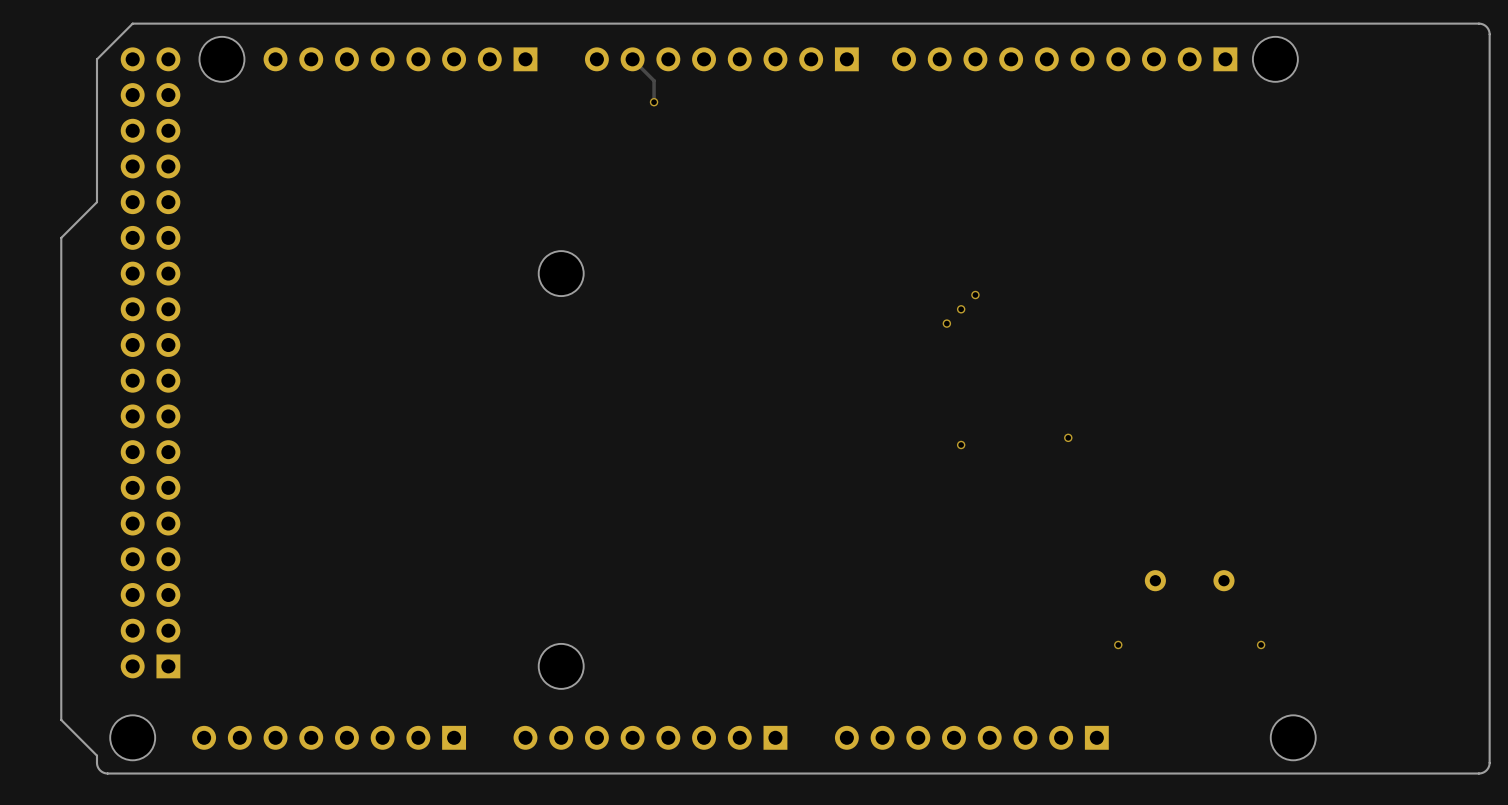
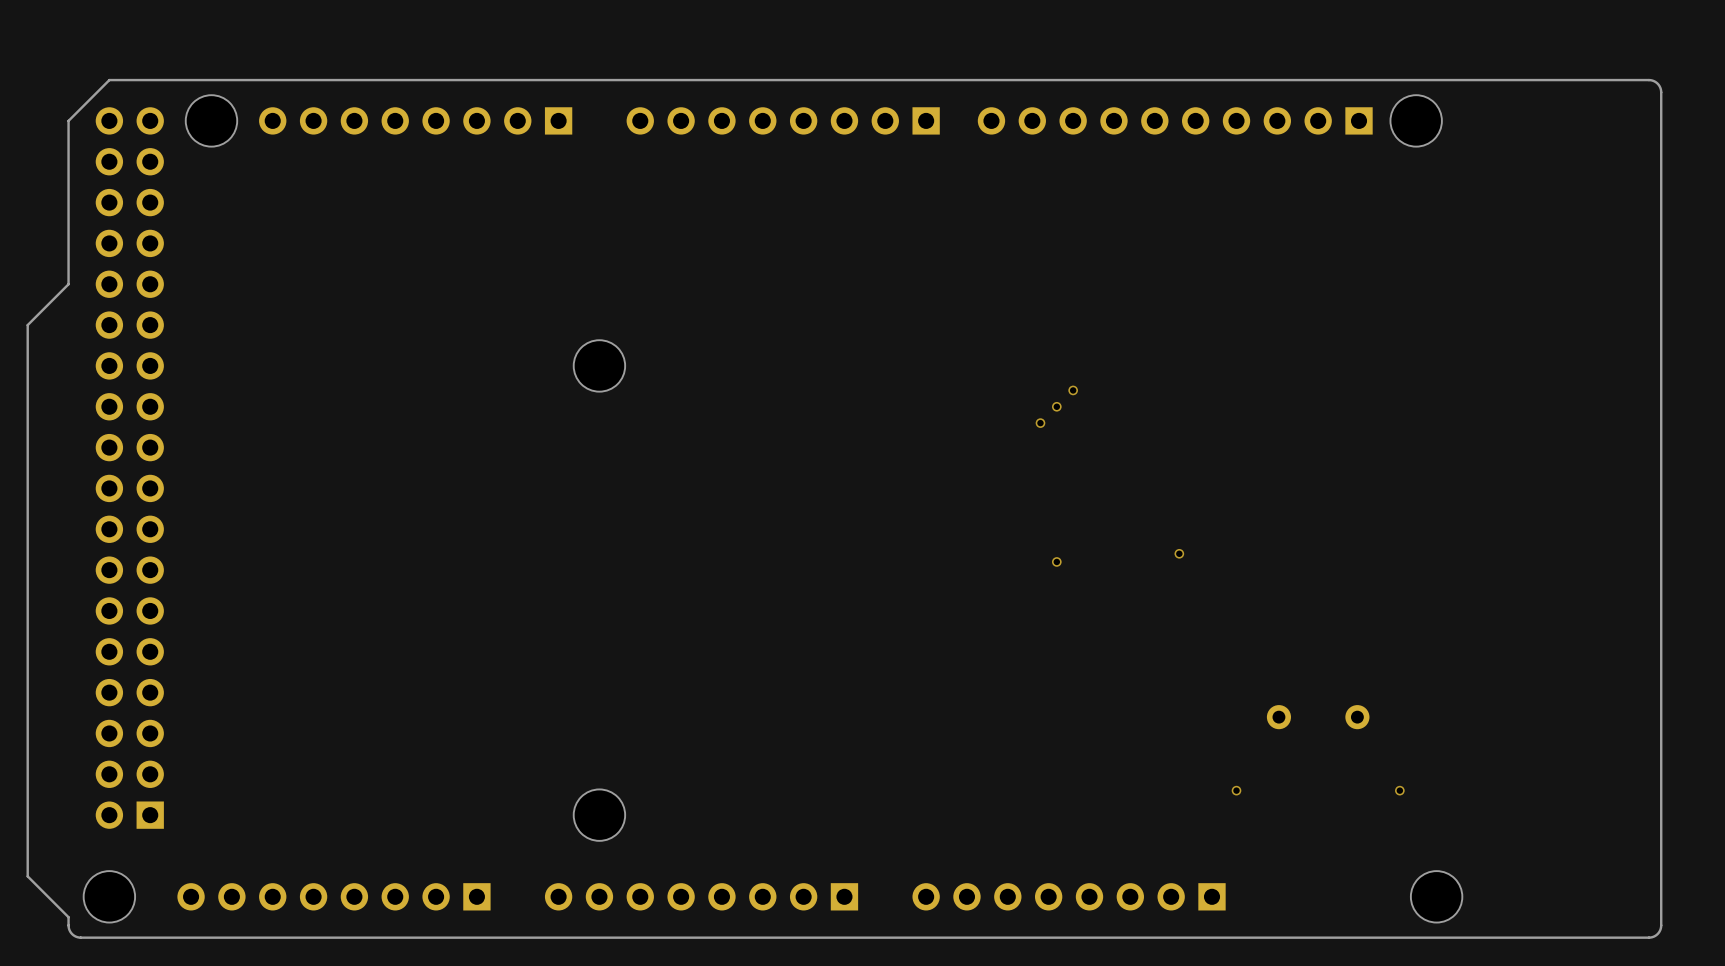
track: (632, 59) (654, 80) (654, 102) -> none
via: (654, 102) -> none

